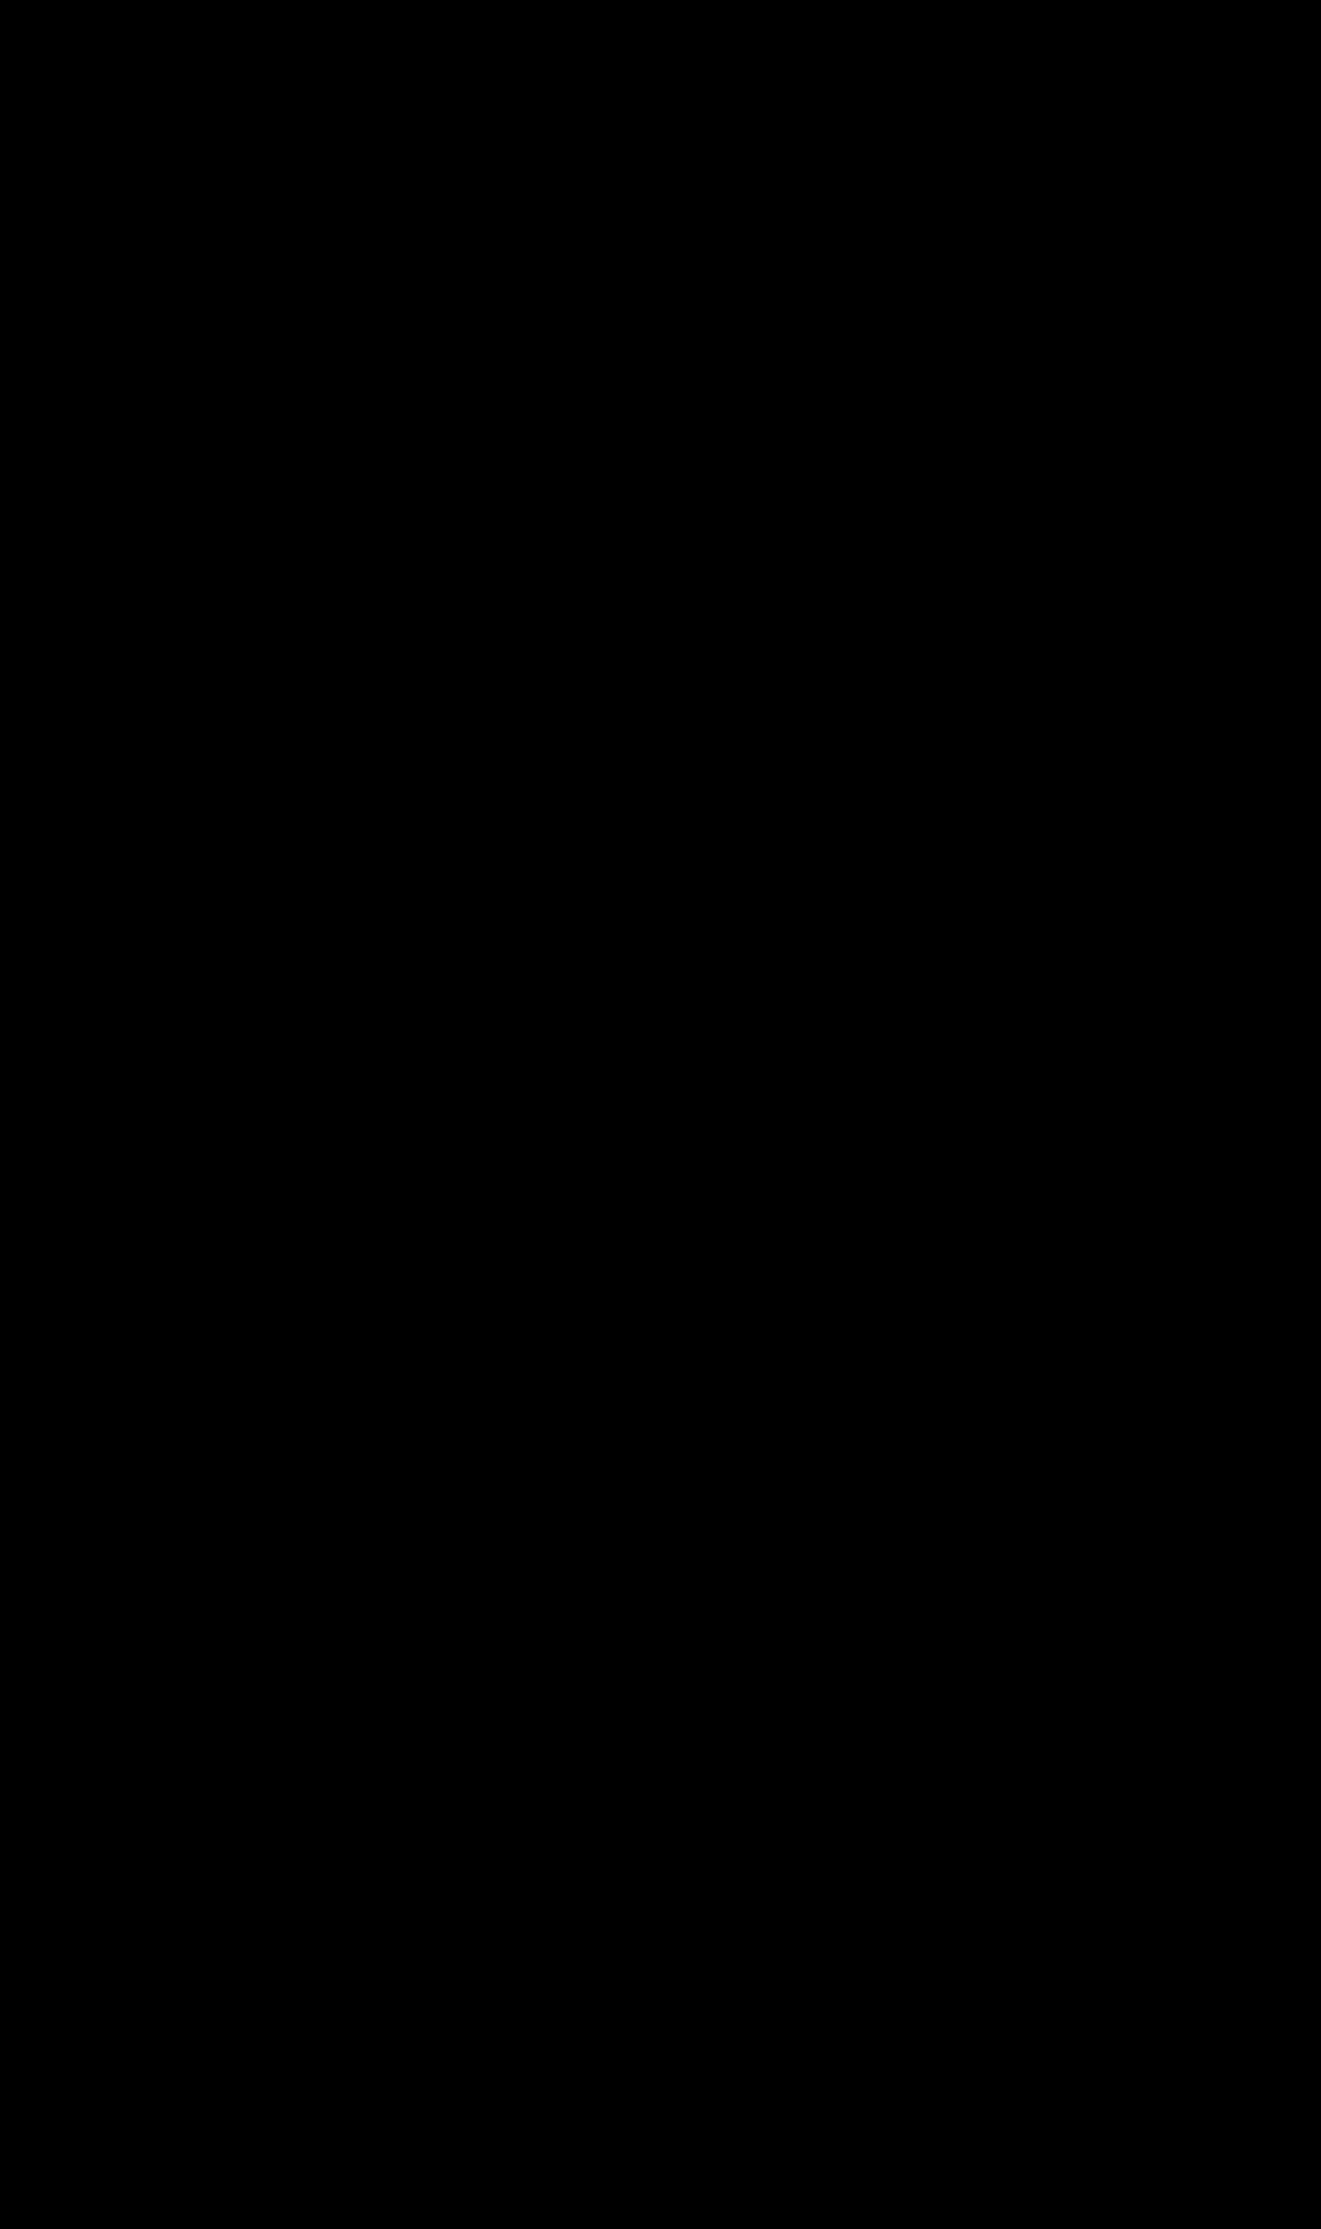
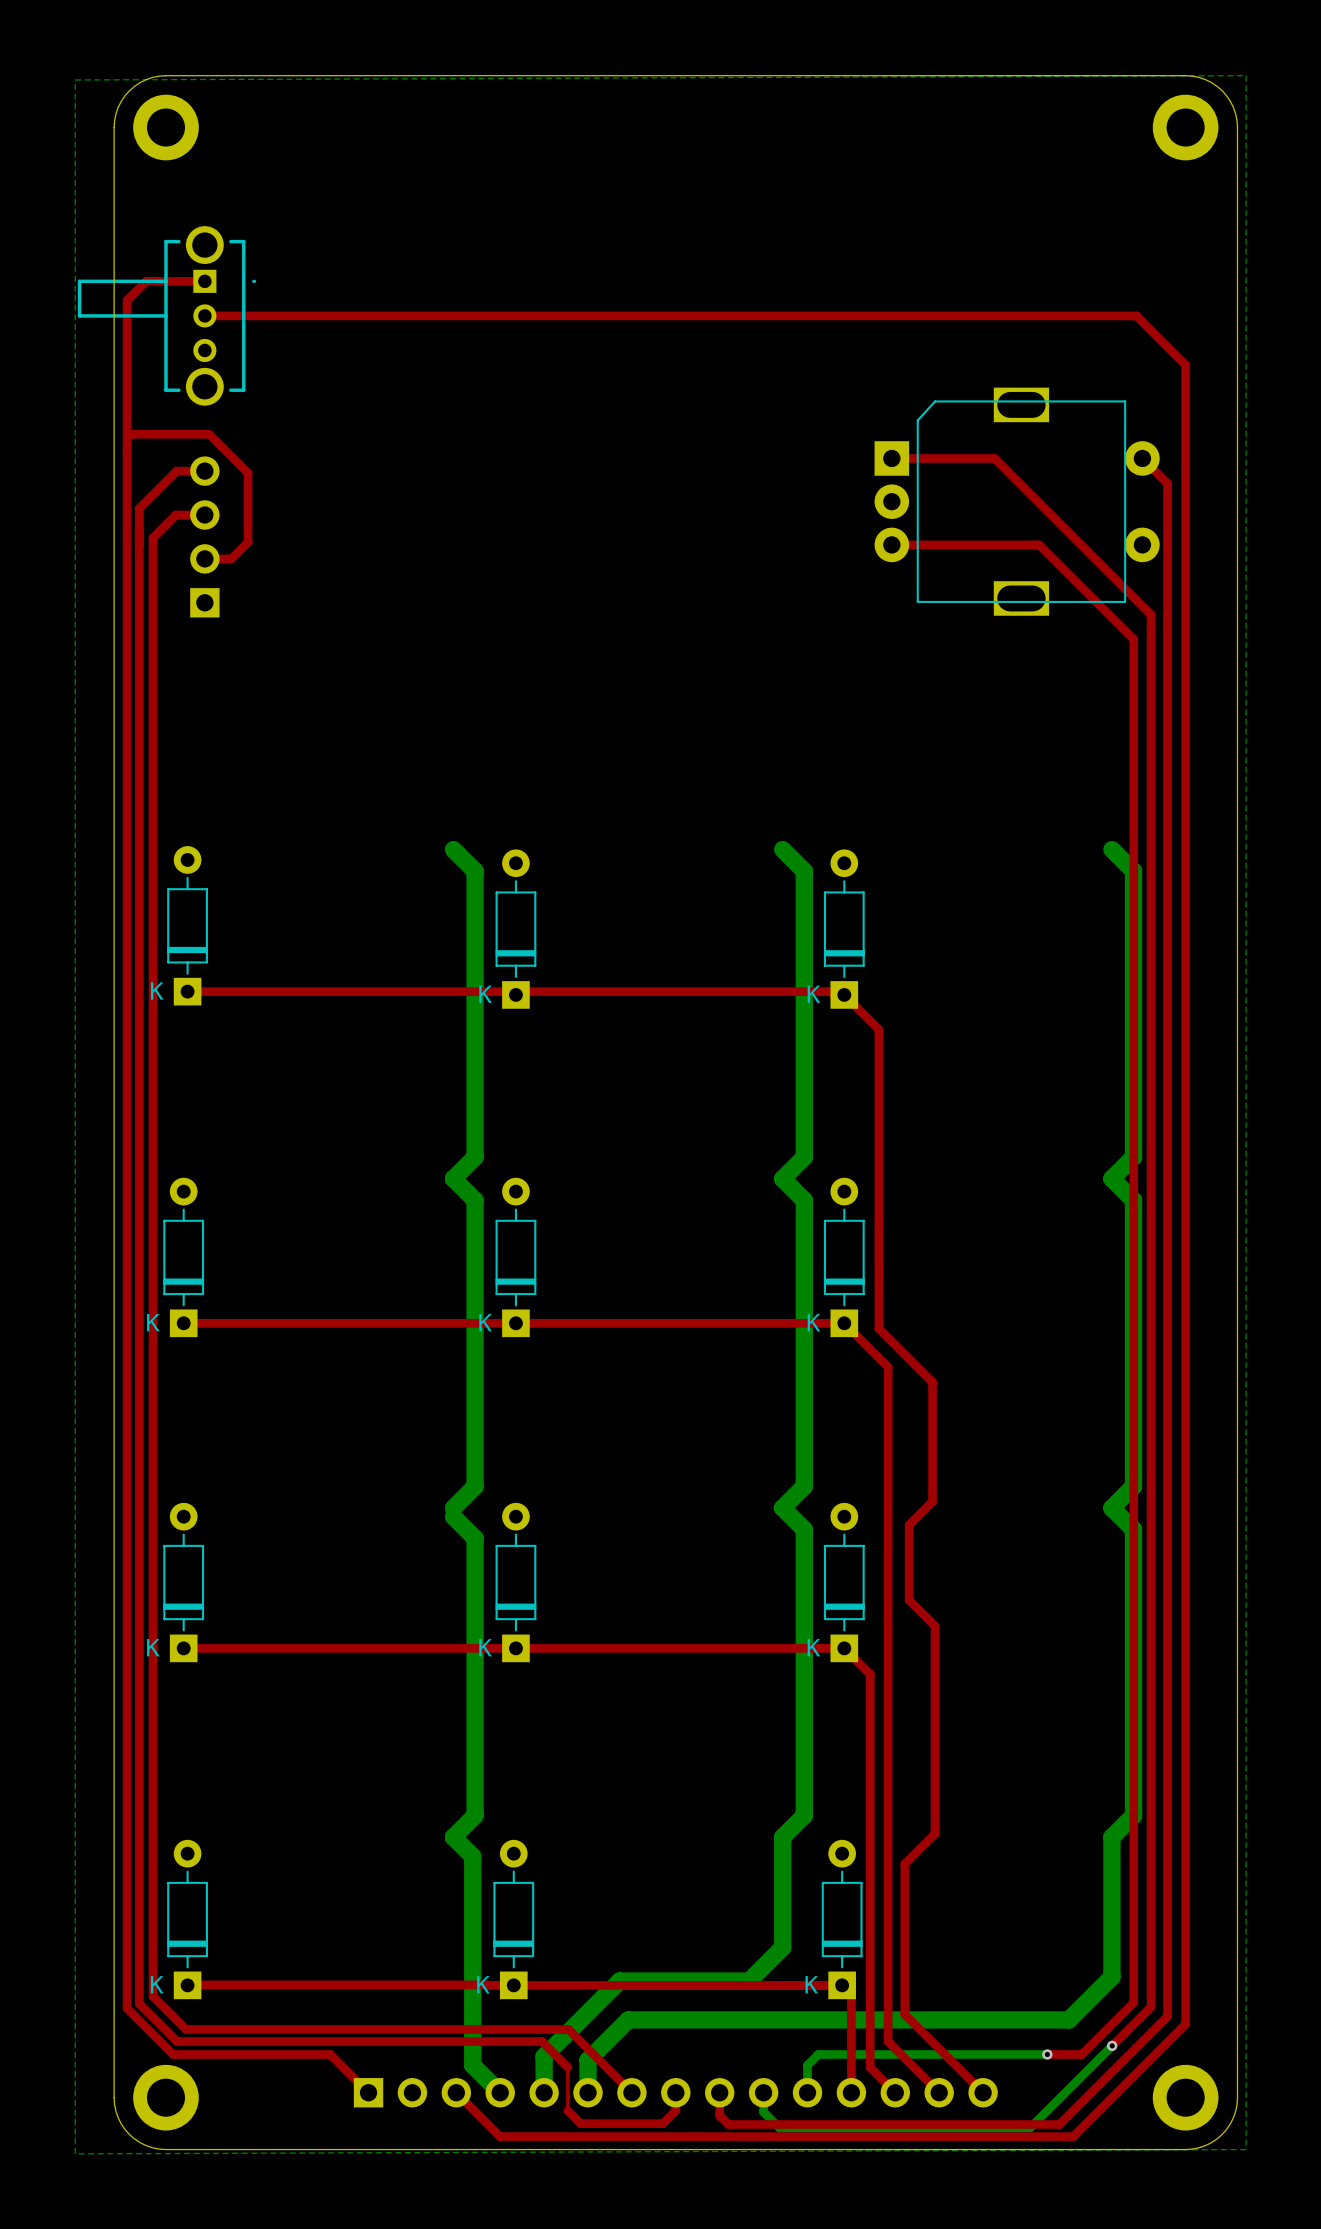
board edge: none -> (165, 75) (1185, 75) (1199, 77) (1211, 82) (1222, 90) (1230, 101) (1235, 114) (1237, 127) (1237, 2097) (1235, 2111) (1230, 2123) (1222, 2134) (1211, 2142) (1199, 2147) (1185, 2149) (165, 2149) (152, 2147) (140, 2142) (129, 2134) (121, 2123) (115, 2111) (114, 2097) (114, 127) (118, 107) (129, 90) (146, 79) (165, 75)
bottom zone outline: none -> (1246, 75) (75, 80) (75, 2153) (1246, 2149) (1246, 75)
part: none -> (165, 127)
part: none -> (1185, 127)
top track: none -> (204, 281) (146, 281) (127, 300) (127, 2008) (173, 2054) (330, 2054) (368, 2092)
part: none -> (166, 315)
top track: none -> (204, 315) (1136, 315) (1185, 365) (1185, 2024) (1073, 2136) (500, 2136) (456, 2092)
top track: none -> (127, 438) (131, 434) (209, 434) (248, 473) (248, 542) (231, 558) (204, 558)
top track: none -> (891, 458) (994, 458) (1151, 614) (1151, 2006) (1112, 2045)
top track: none -> (1142, 458) (1167, 483) (1167, 2016) (1059, 2124) (728, 2124) (719, 2115) (719, 2092)
top track: none -> (204, 471) (176, 471) (139, 508) (139, 2003) (177, 2041) (541, 2041) (567, 2067) (567, 2110) (580, 2123) (662, 2123) (675, 2110) (675, 2092)
part: none -> (1017, 501)
top track: none -> (204, 515) (176, 515) (153, 537) (153, 1996) (185, 2029) (568, 2029) (631, 2092)
part: none -> (204, 536)
top track: none -> (891, 544) (1039, 544) (1133, 639) (1133, 2002) (1081, 2054) (1047, 2054)
bottom track: none -> (453, 849) (475, 871) (475, 1157) (453, 1178) (475, 1200) (475, 1486) (453, 1507)
bottom track: none -> (782, 849) (804, 871) (804, 1157) (782, 1178) (804, 1200) (804, 1486) (782, 1507) (804, 1529) (804, 1815) (782, 1837) (782, 1947) (749, 1981) (619, 1981) (544, 2056) (544, 2092)
bottom track: none -> (1111, 849) (1133, 871) (1133, 1157) (1111, 1178) (1133, 1200) (1133, 1486) (1111, 1507) (1133, 1529) (1133, 1815) (1111, 1837) (1111, 1976) (1068, 2019) (628, 2019) (588, 2060) (588, 2092)
part: none -> (187, 925)
part: none -> (515, 929)
part: none -> (844, 929)
top track: none -> (187, 991) (830, 991) (833, 994) (844, 994) (878, 1029) (878, 1328) (932, 1382) (932, 1501) (909, 1525) (909, 1600) (935, 1626) (935, 1833) (904, 1864) (904, 2014) (983, 2092)
part: none -> (183, 1257)
part: none -> (515, 1257)
part: none -> (844, 1257)
top track: none -> (183, 1323) (844, 1323) (888, 1367) (888, 2041) (939, 2092)
bottom track: none -> (453, 1516) (475, 1538) (475, 1815) (453, 1837) (472, 1856) (472, 2065) (500, 2092)
part: none -> (183, 1582)
part: none -> (515, 1582)
part: none -> (844, 1582)
top track: none -> (183, 1648) (844, 1648) (870, 1674) (870, 2067) (895, 2092)
part: none -> (187, 1919)
part: none -> (513, 1919)
part: none -> (842, 1919)
top track: none -> (188, 1984) (842, 1985) (851, 1994) (851, 2092)
bottom track: none -> (1112, 2045) (1030, 2127) (779, 2127) (763, 2112) (763, 2092)
via: none -> (1112, 2045)
bottom track: none -> (1047, 2054) (818, 2054) (807, 2065) (807, 2092)
via: none -> (1047, 2054)
part: none -> (675, 2092)
part: none -> (165, 2097)
part: none -> (1185, 2097)

